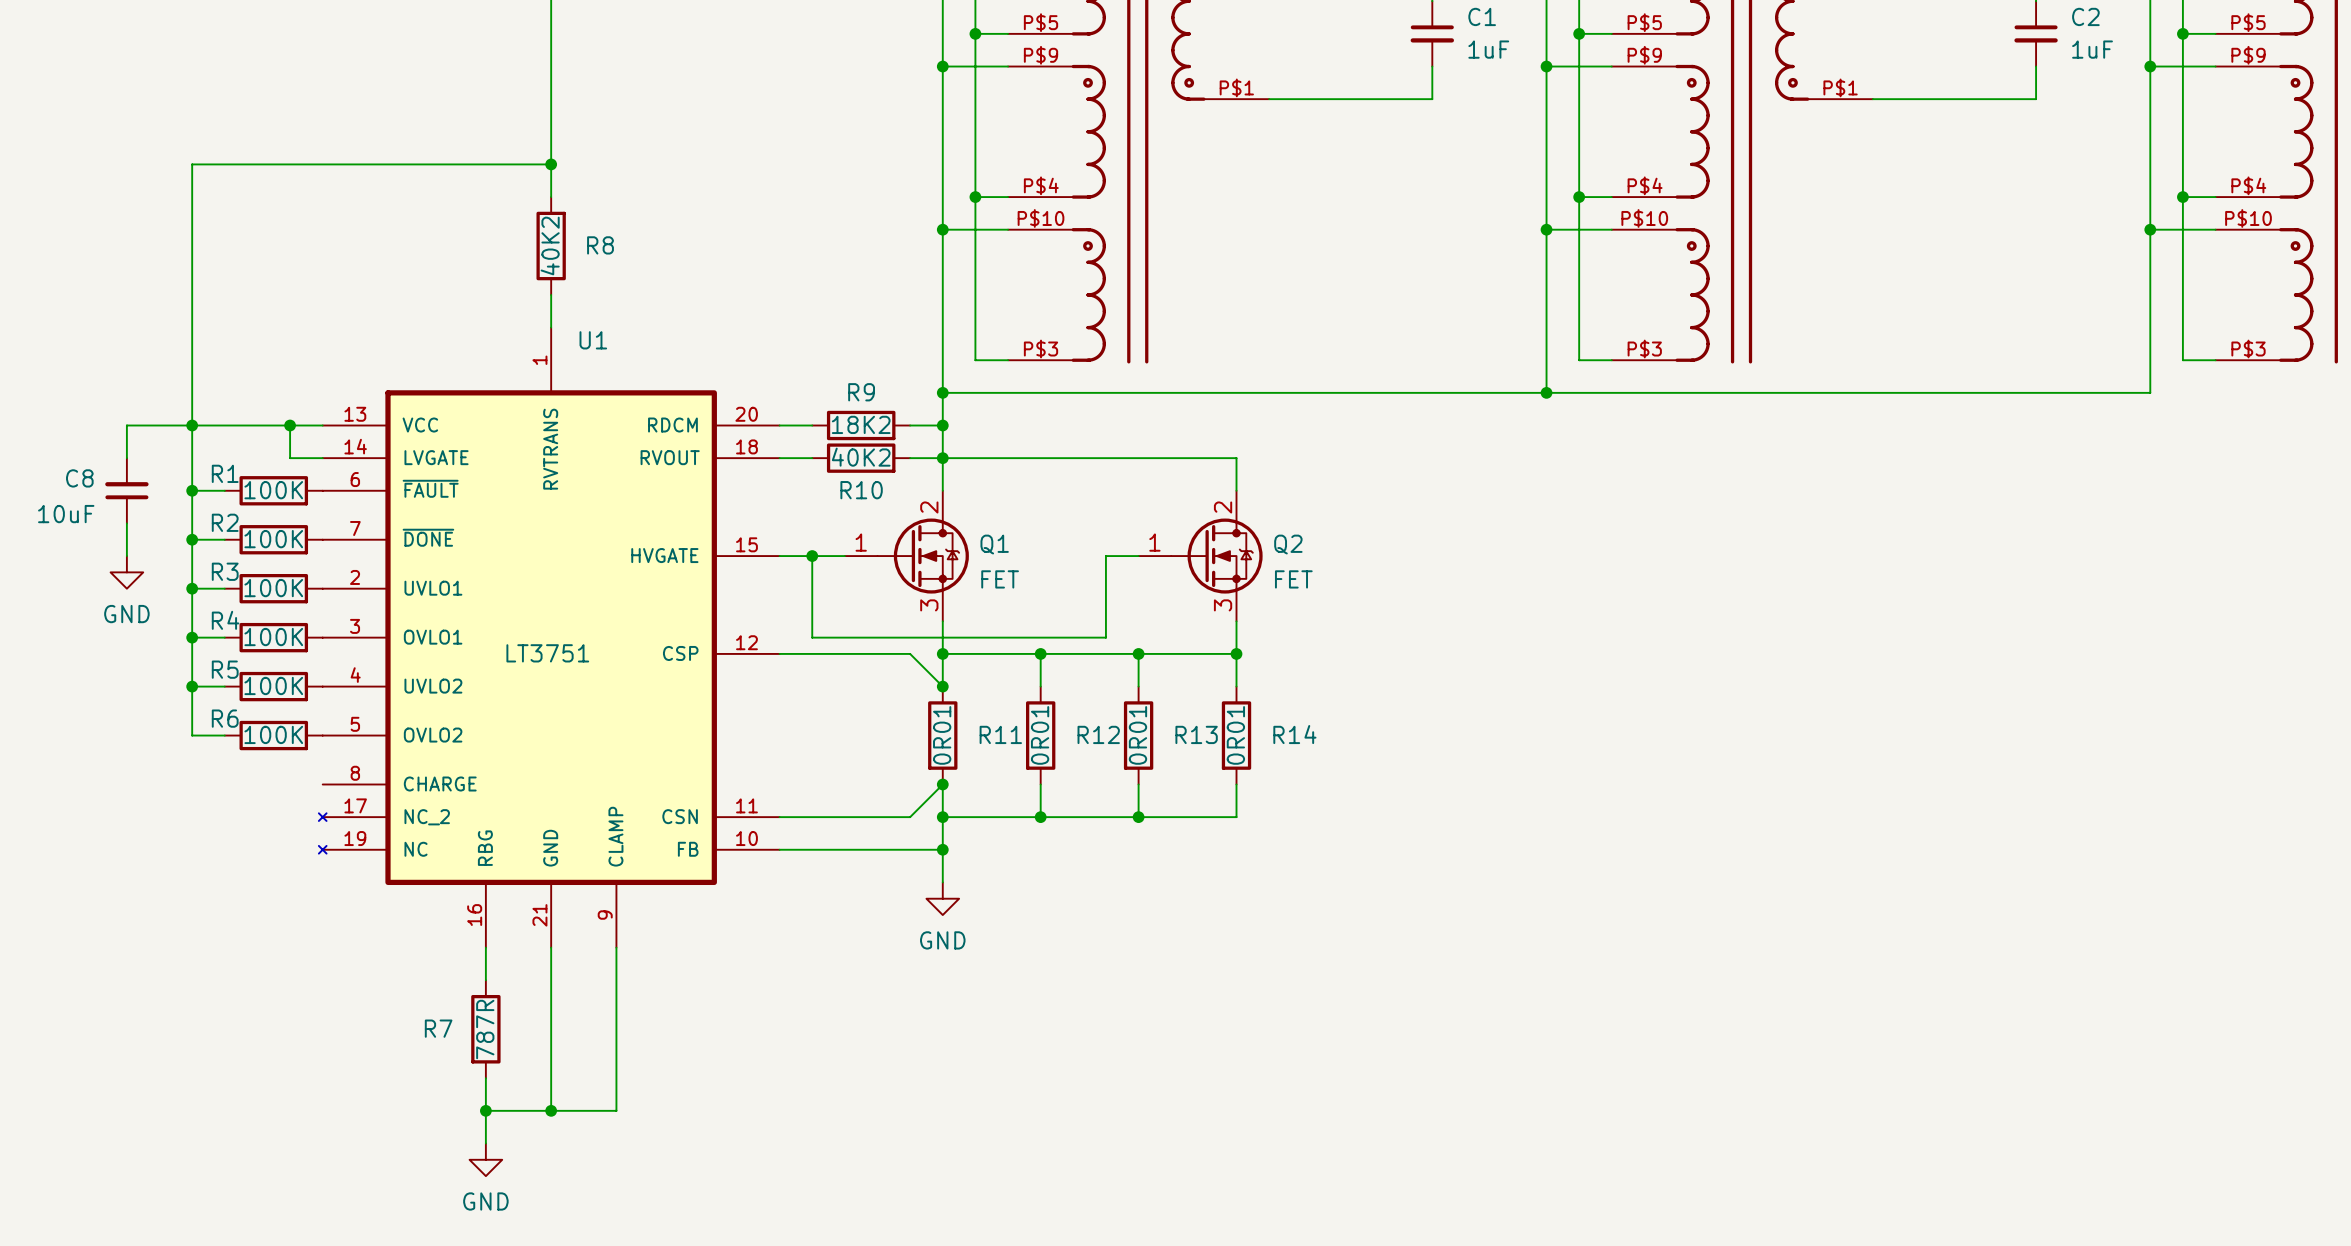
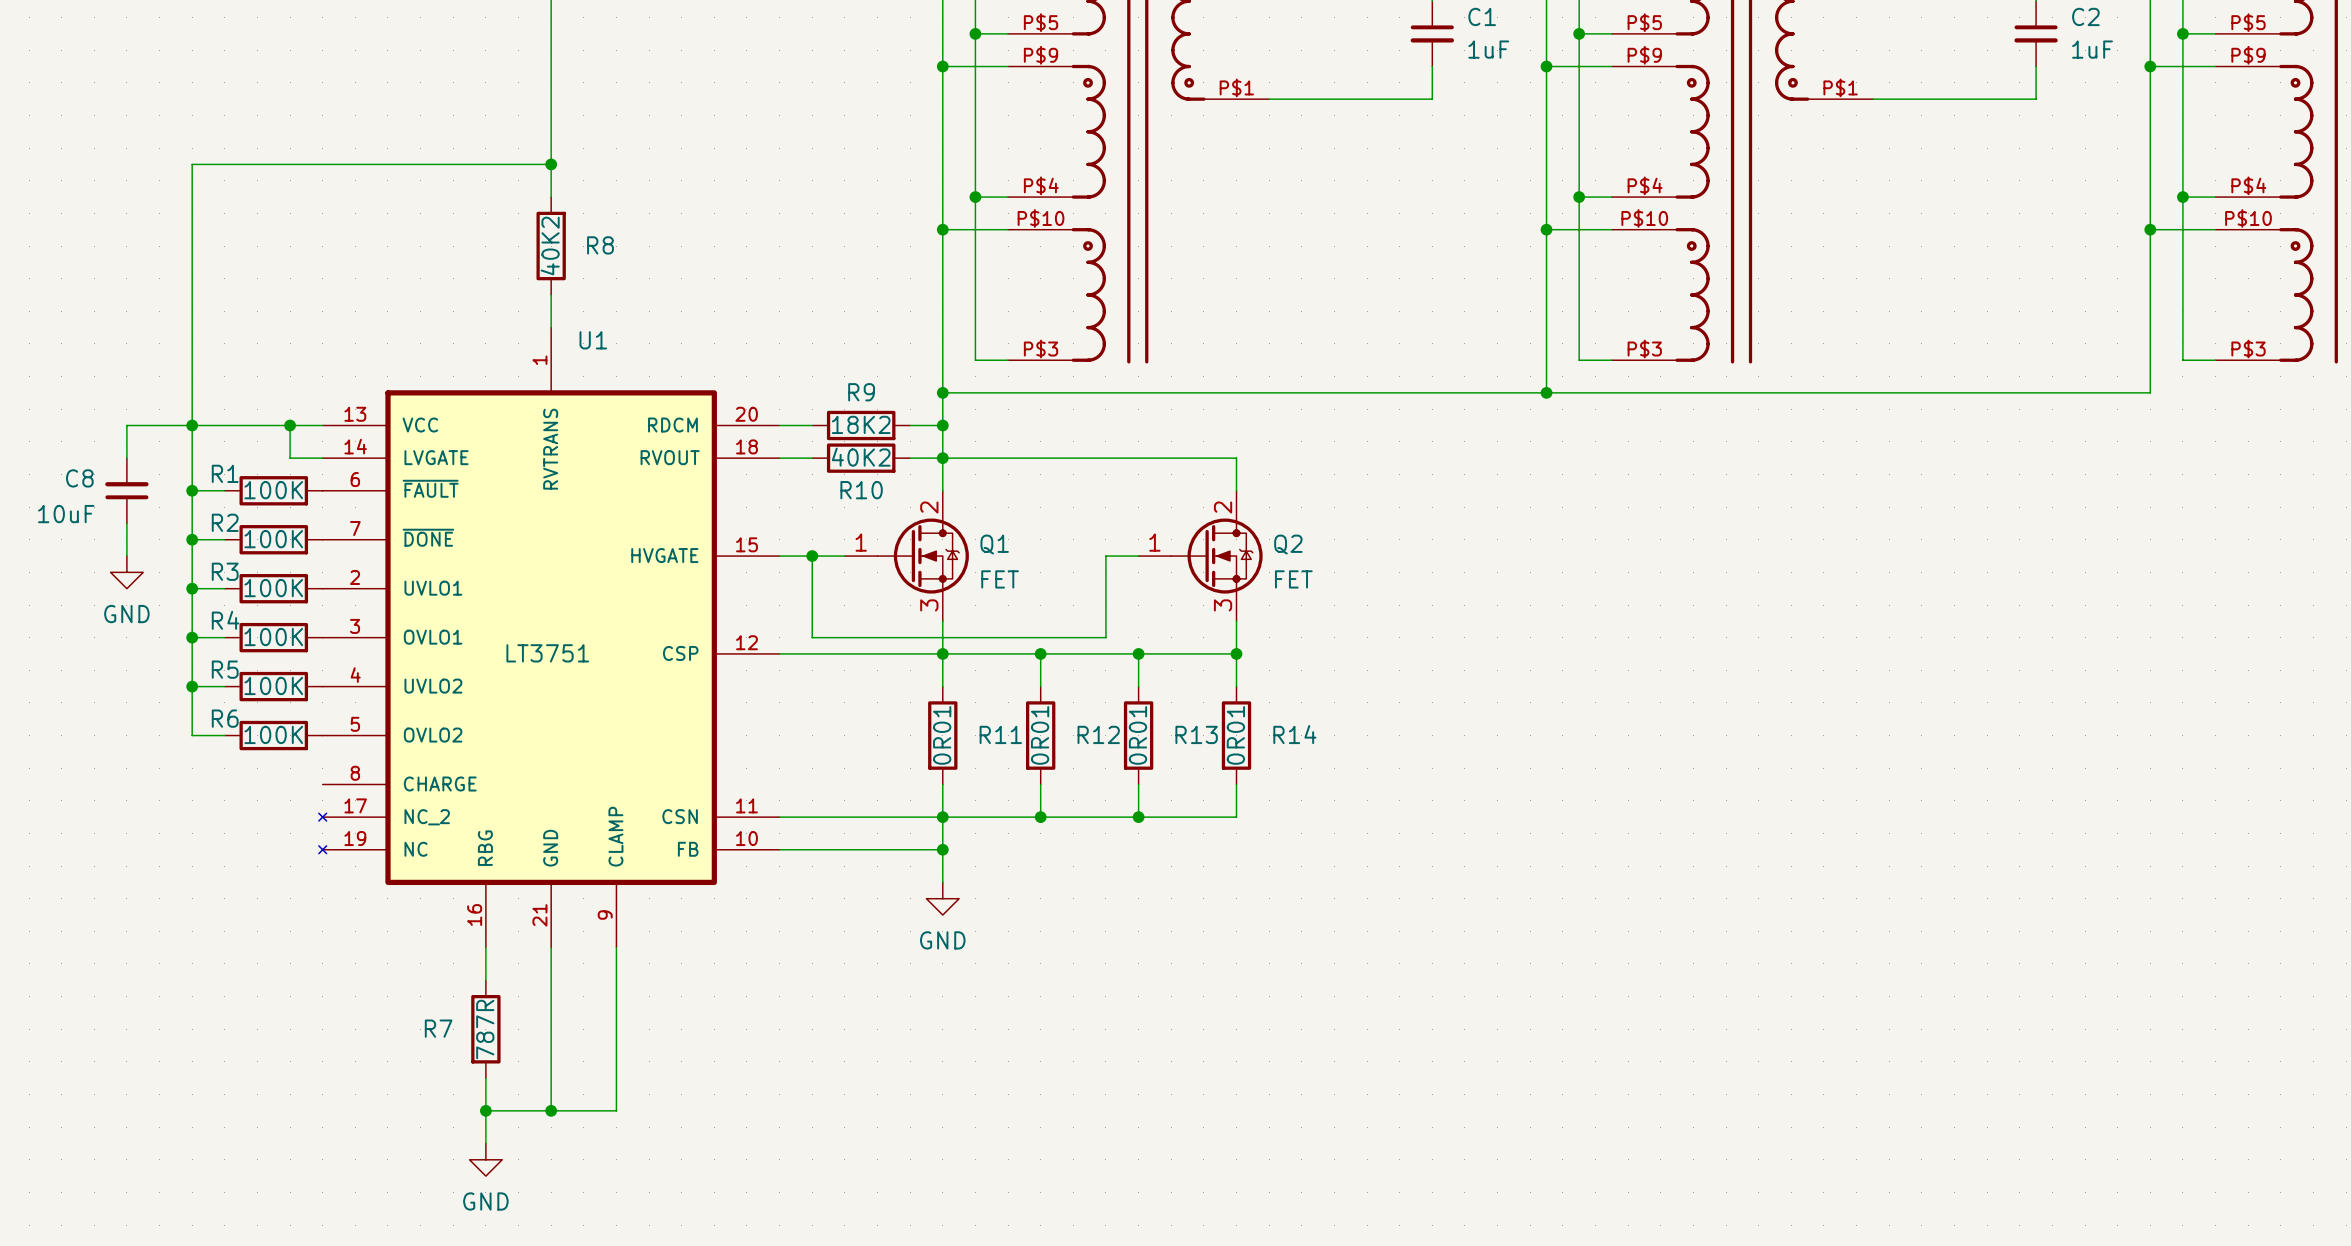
wire: (910, 653) (942, 686) -> (910, 653) (942, 653)
junction: (942, 686) -> none
wire: (942, 784) (910, 817) -> (942, 817) (910, 817)
junction: (942, 784) -> none

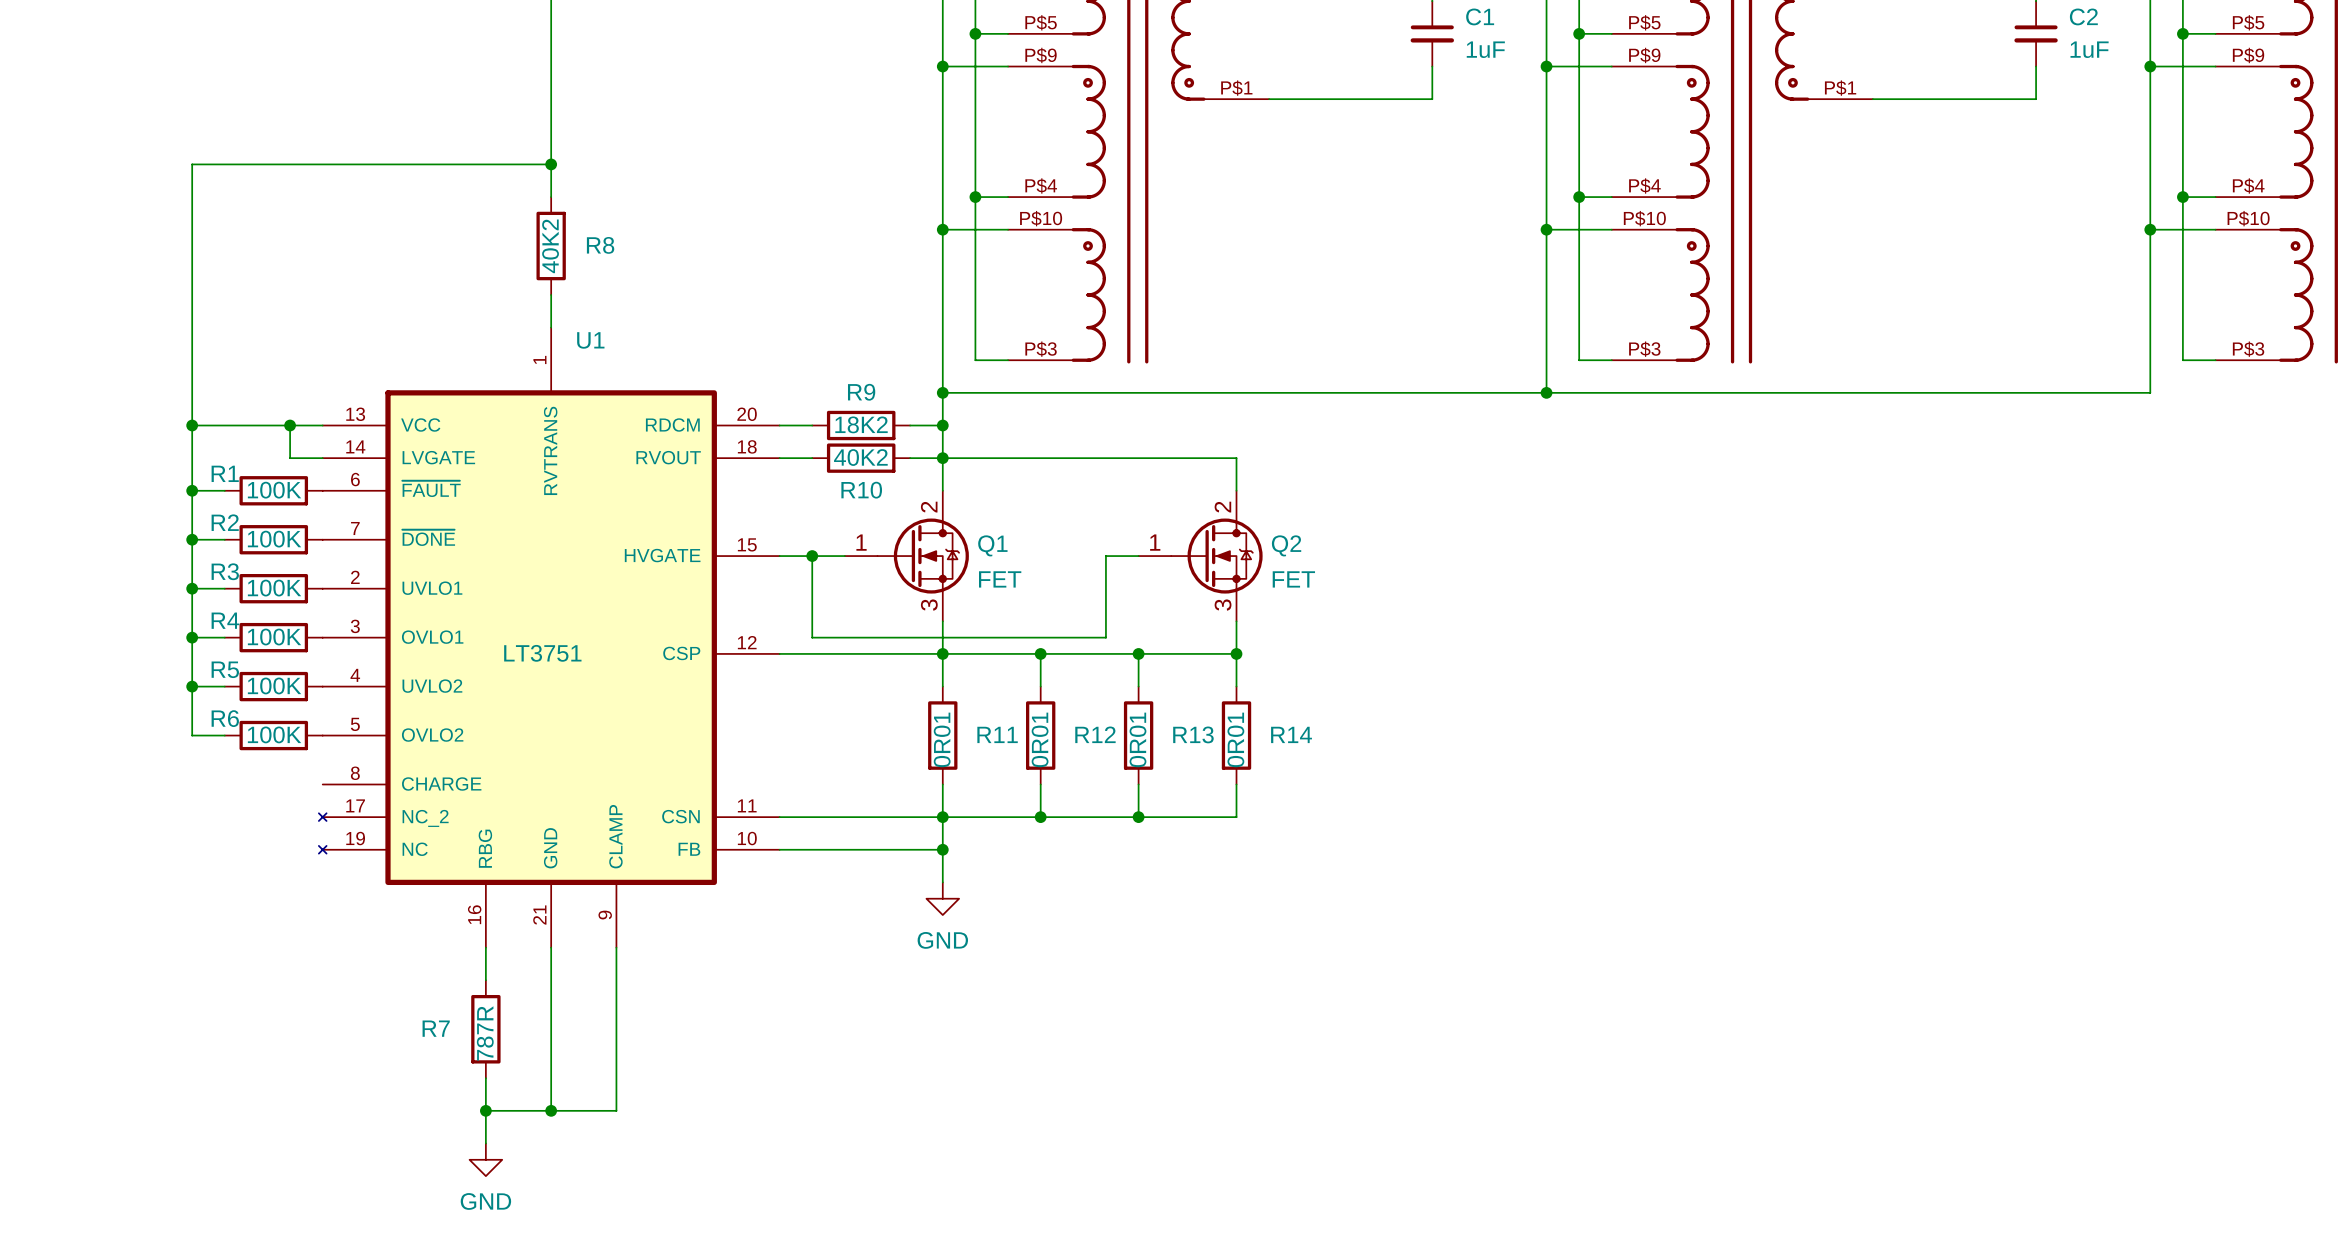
wire: (192, 425) (126, 425) (126, 458) -> none
C8: 10uF (126, 490) -> none
wire: (126, 523) (126, 556) -> none
power symbol: GND (126, 572) -> none

